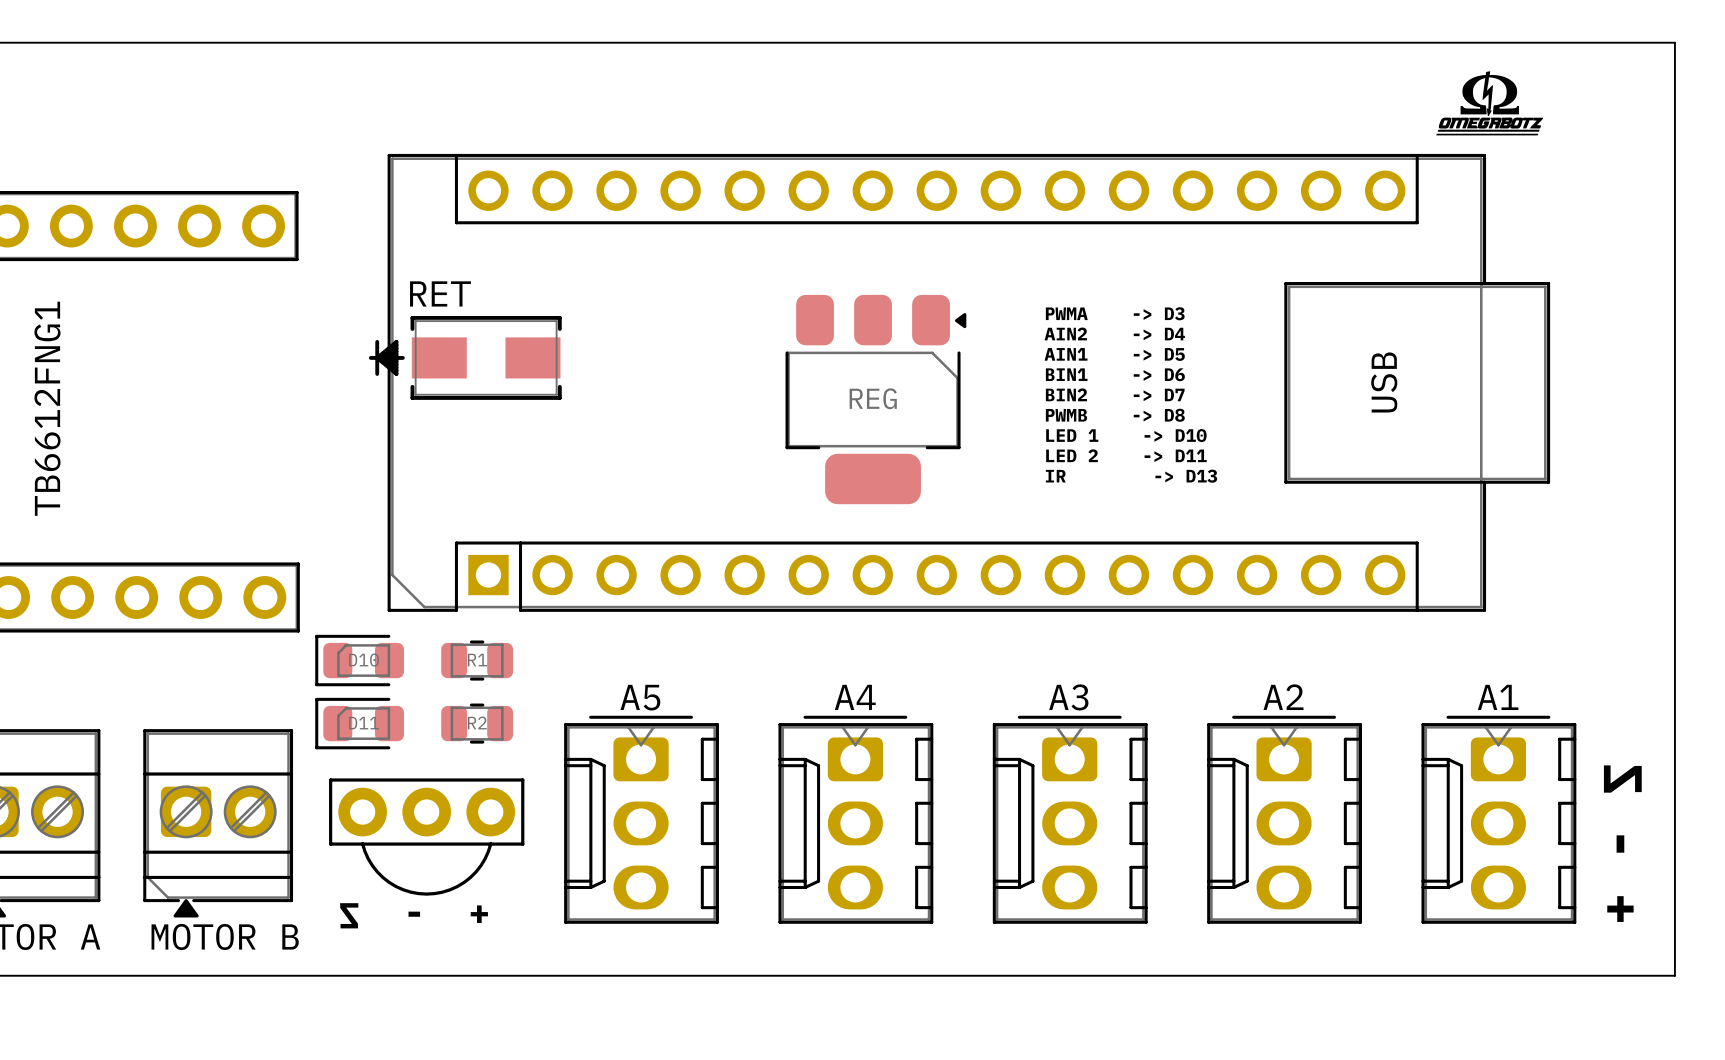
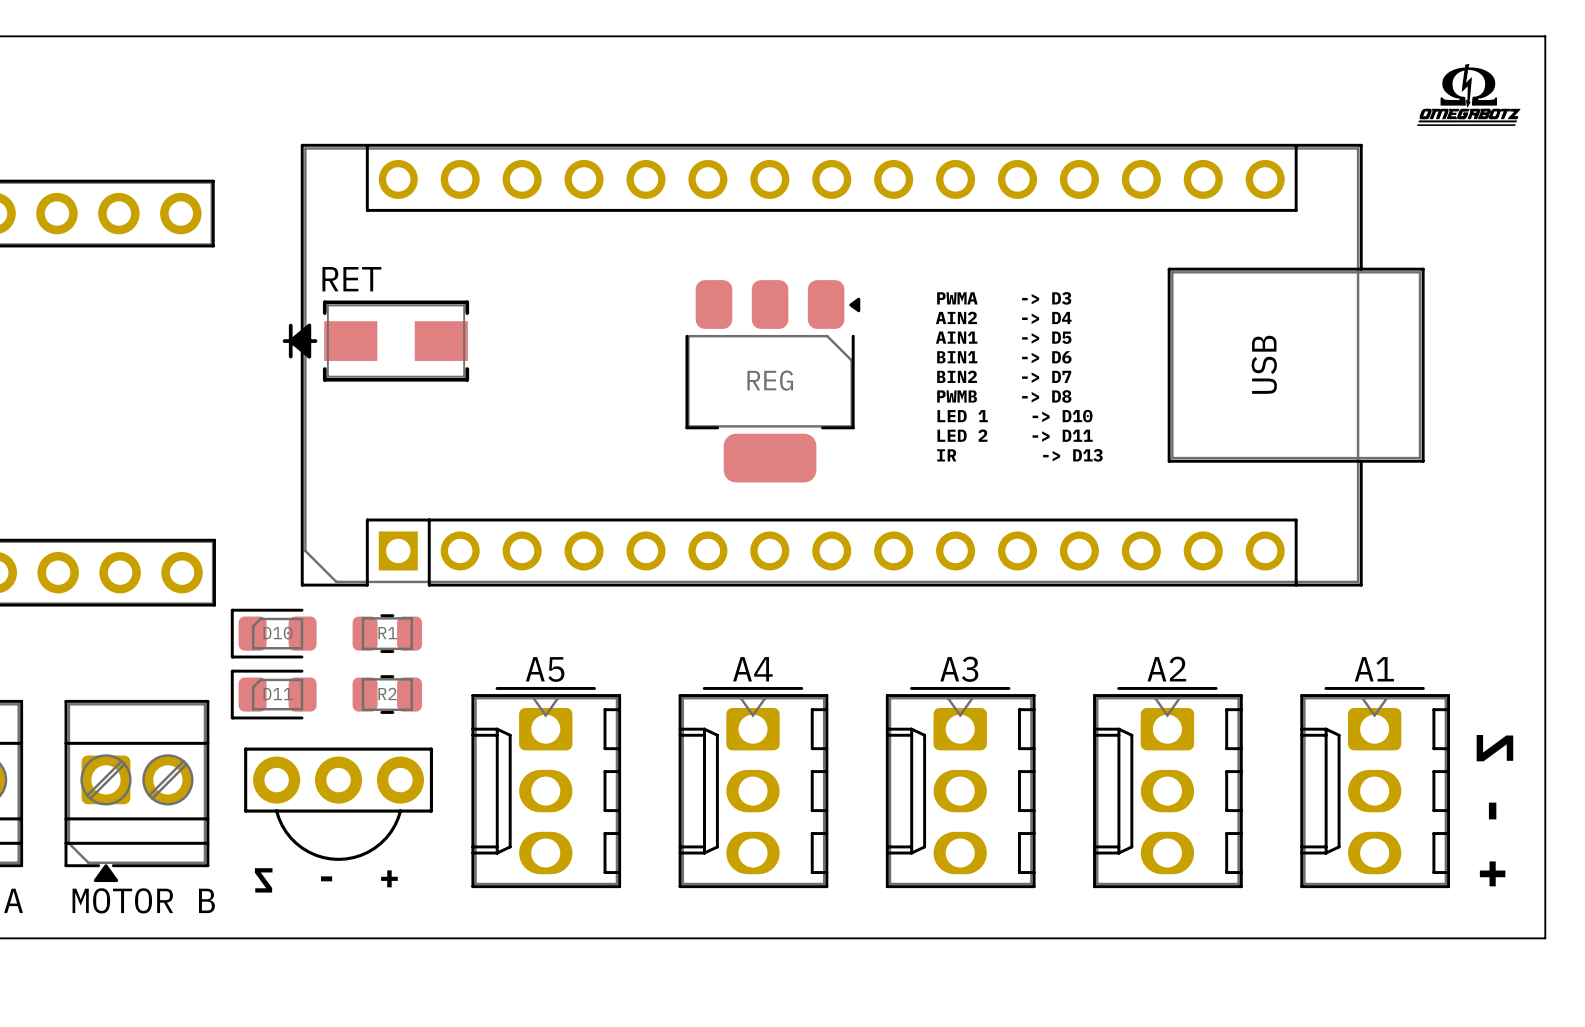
drawing position: (1489, 93) -> (1468, 85)
drawing position: (1445, 123) -> (1425, 114)
drawing position: (1459, 123) -> (1439, 113)
drawing position: (1473, 123) -> (1453, 113)
drawing position: (1484, 123) -> (1463, 114)
drawing position: (1495, 123) -> (1473, 113)
drawing position: (1505, 123) -> (1484, 113)
drawing position: (1521, 123) -> (1499, 113)
drawing position: (1536, 123) -> (1514, 114)
drawing position: (1488, 130) -> (1467, 121)
drawing position: (1487, 134) -> (1466, 125)

